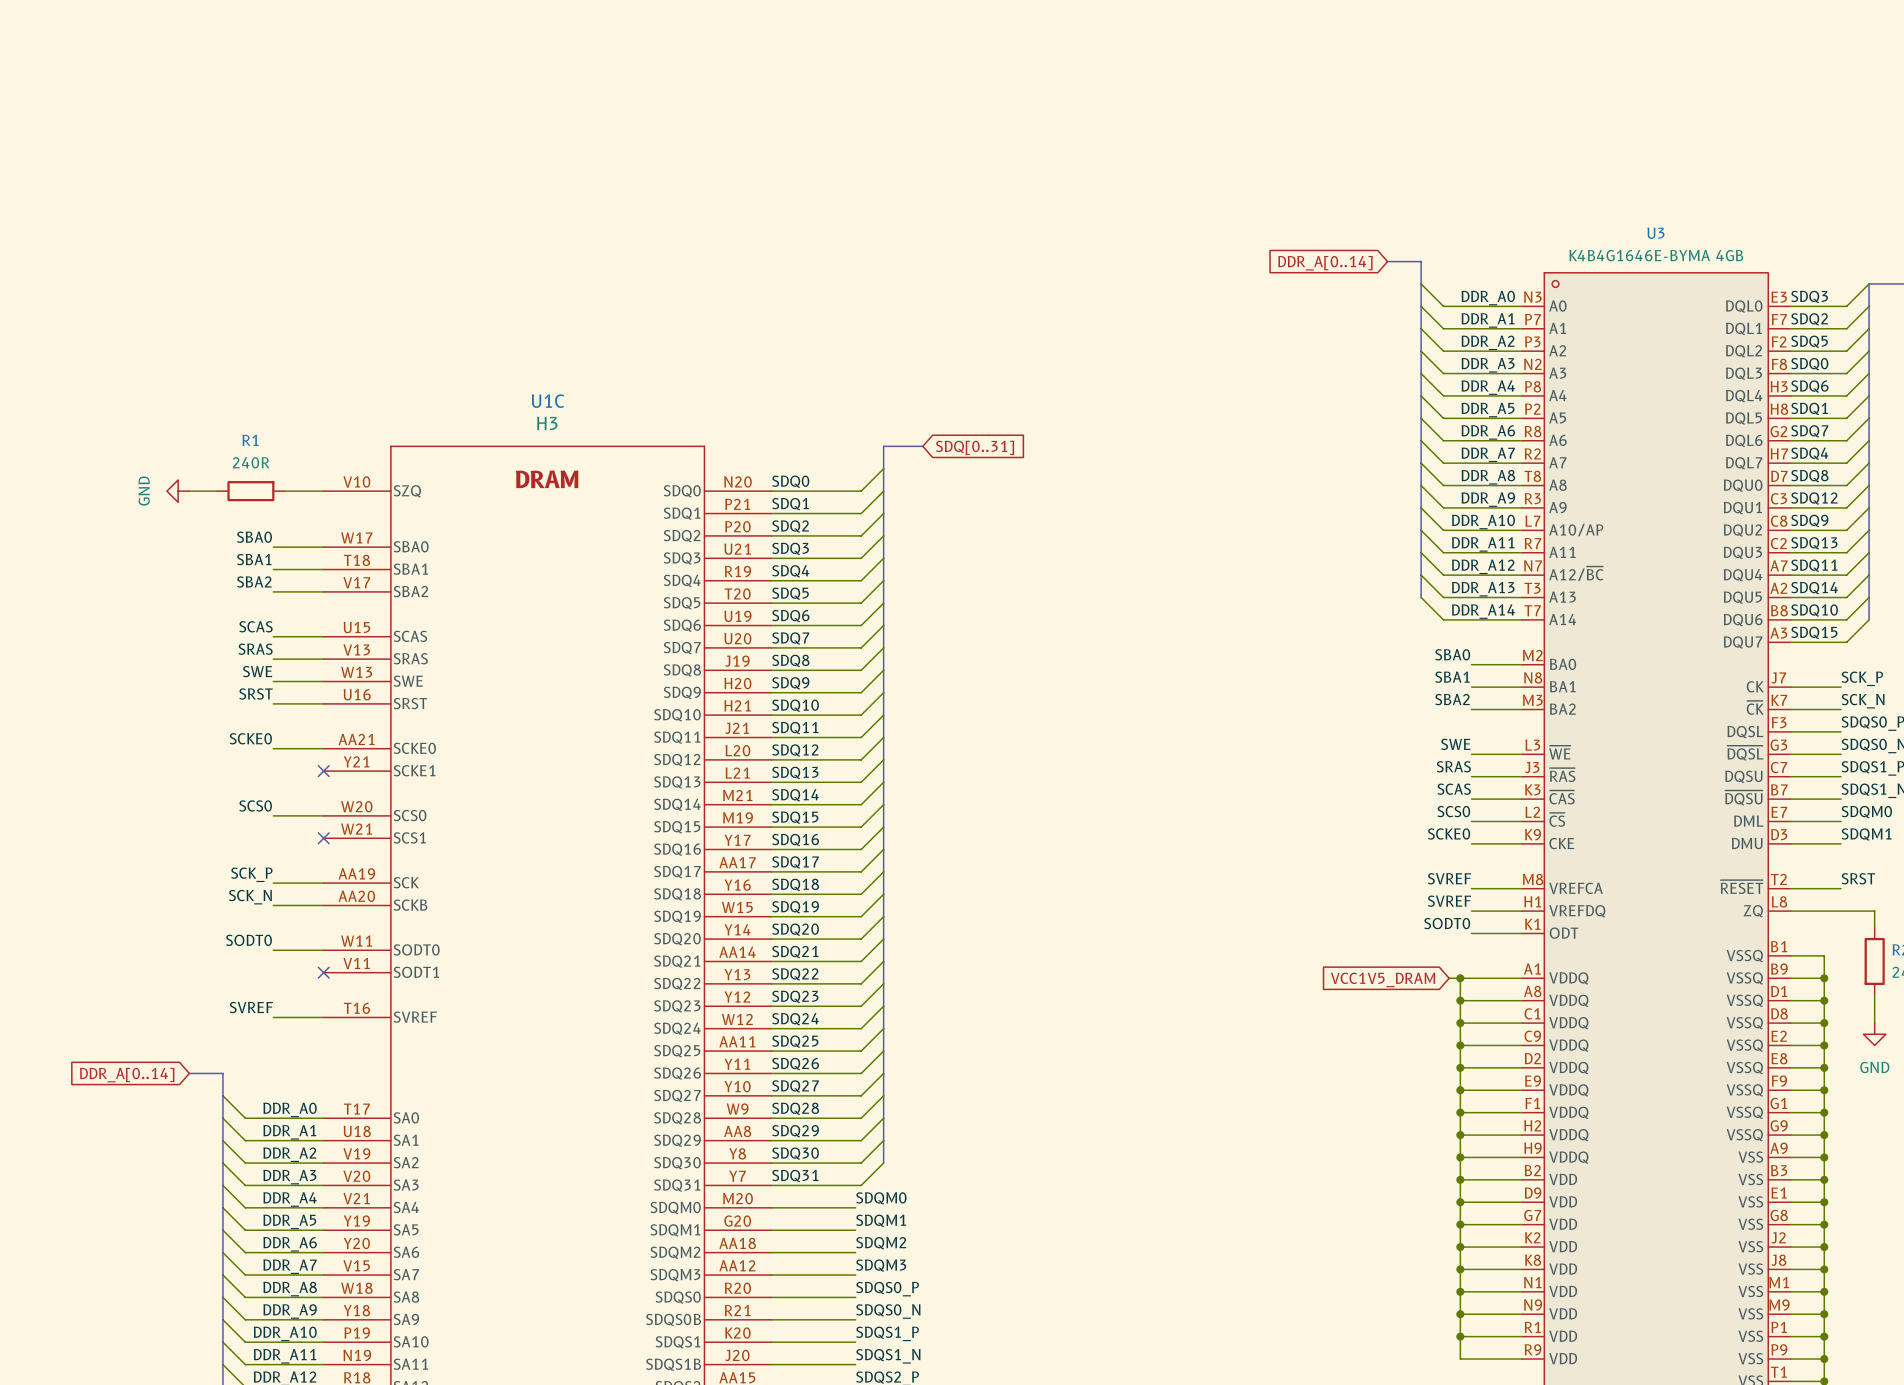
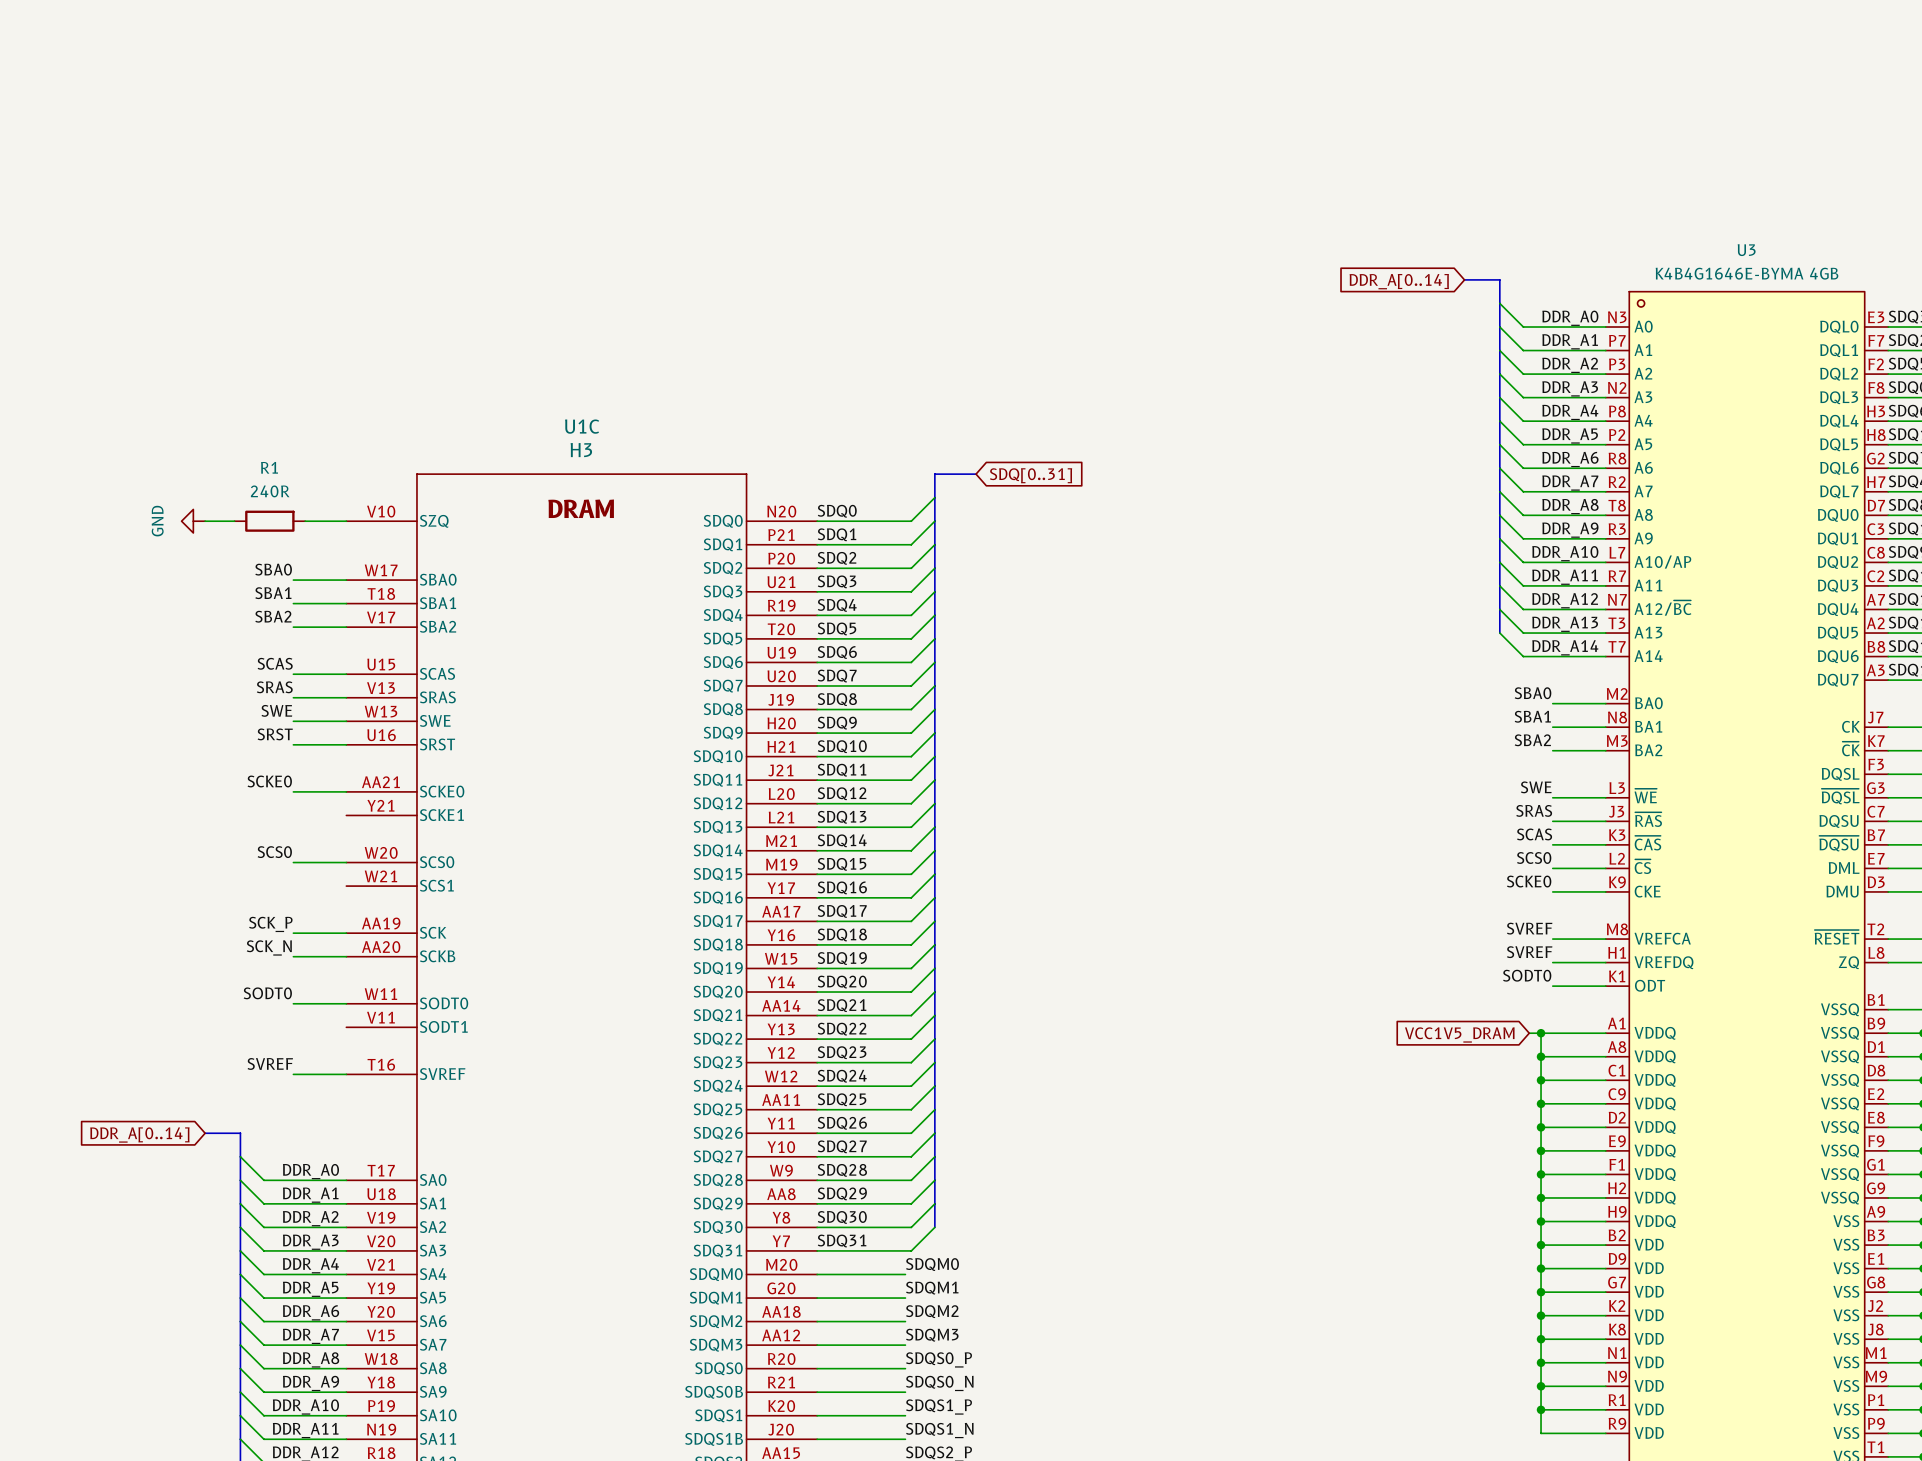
no-connect mark: (323, 771) -> none
no-connect mark: (323, 838) -> none
no-connect mark: (323, 972) -> none

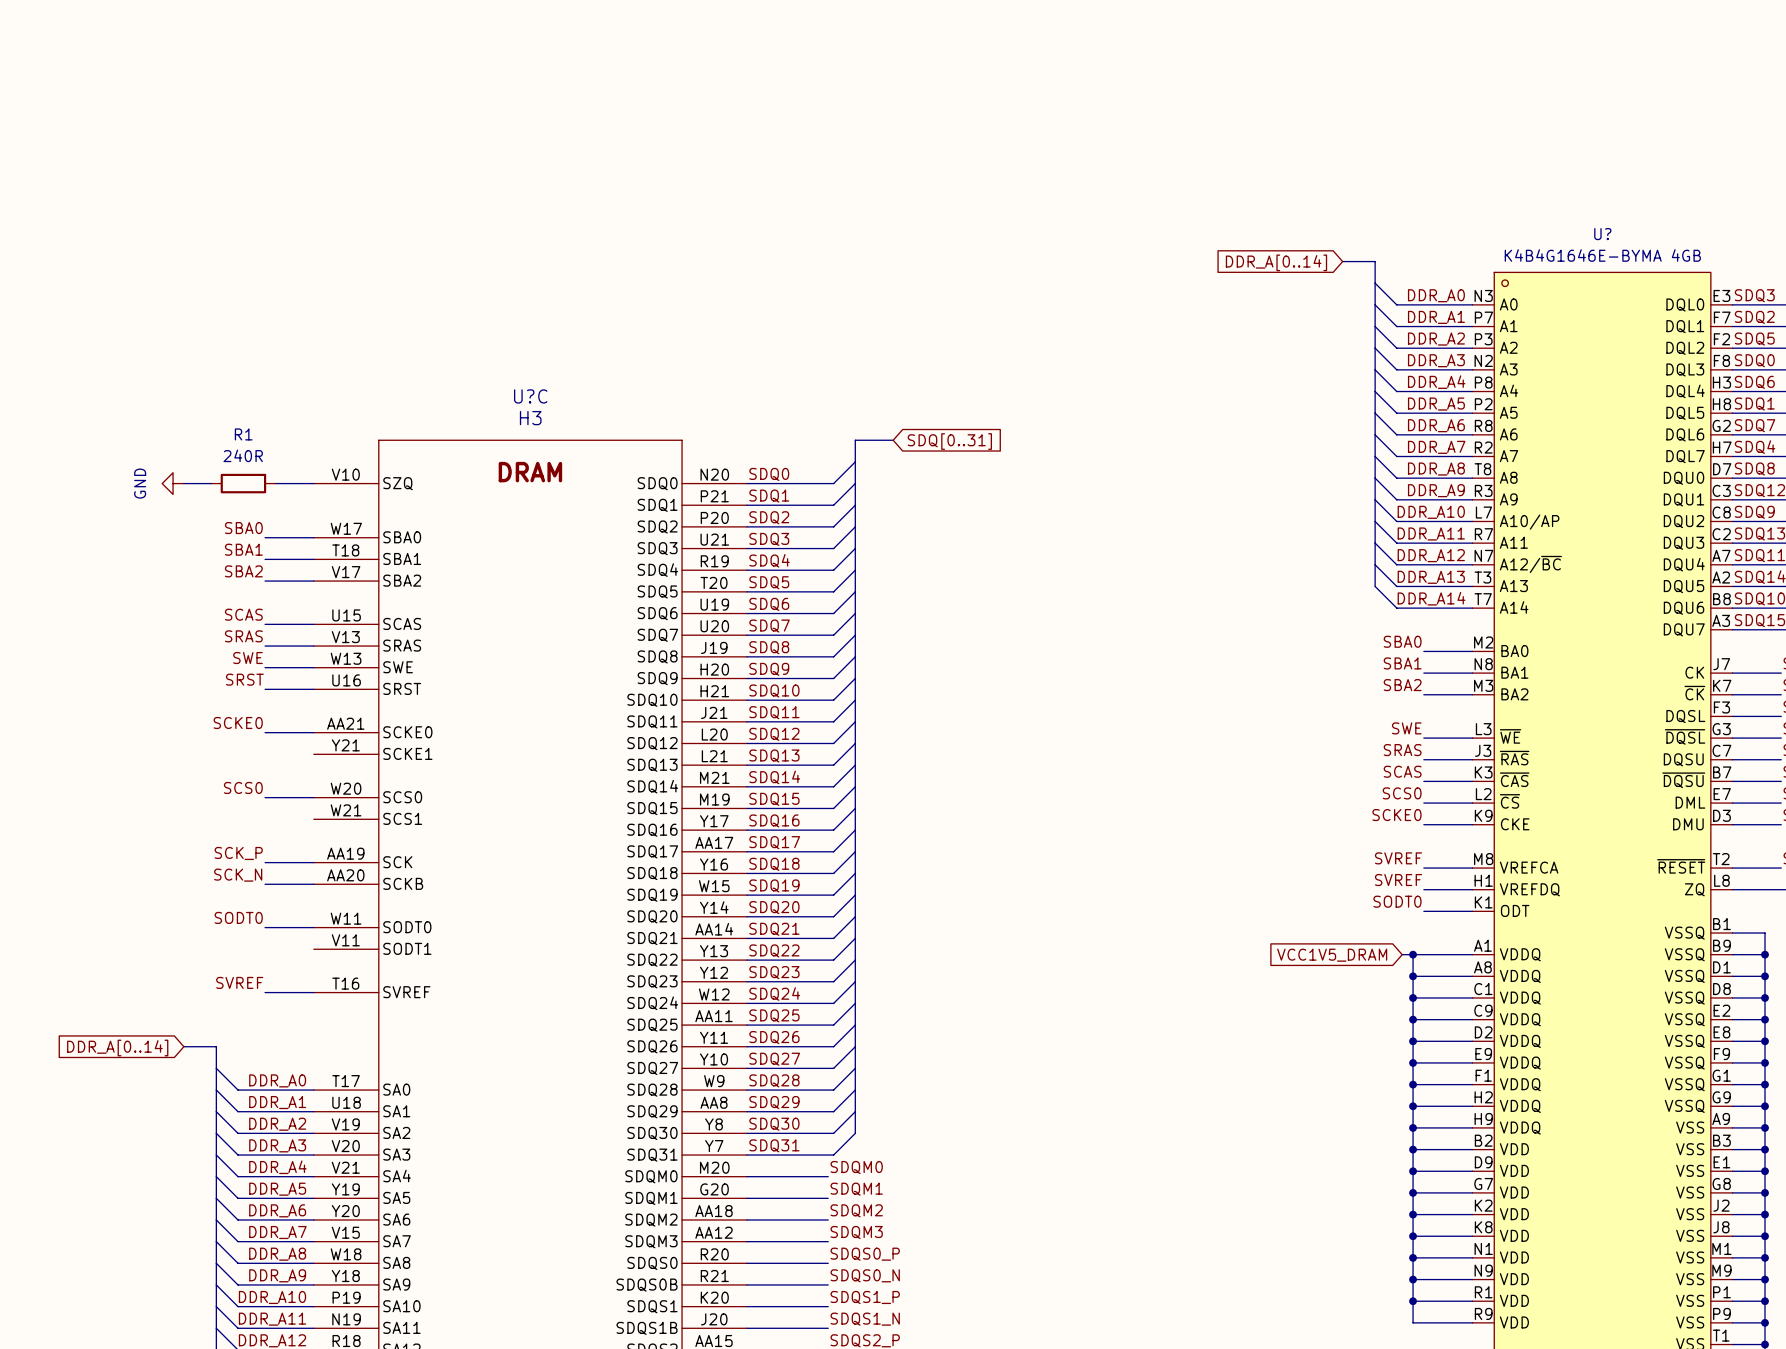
U3 name: U3 (1746, 250) -> U? (1602, 234)
U1C name: U1C (582, 426) -> U?C (530, 396)

